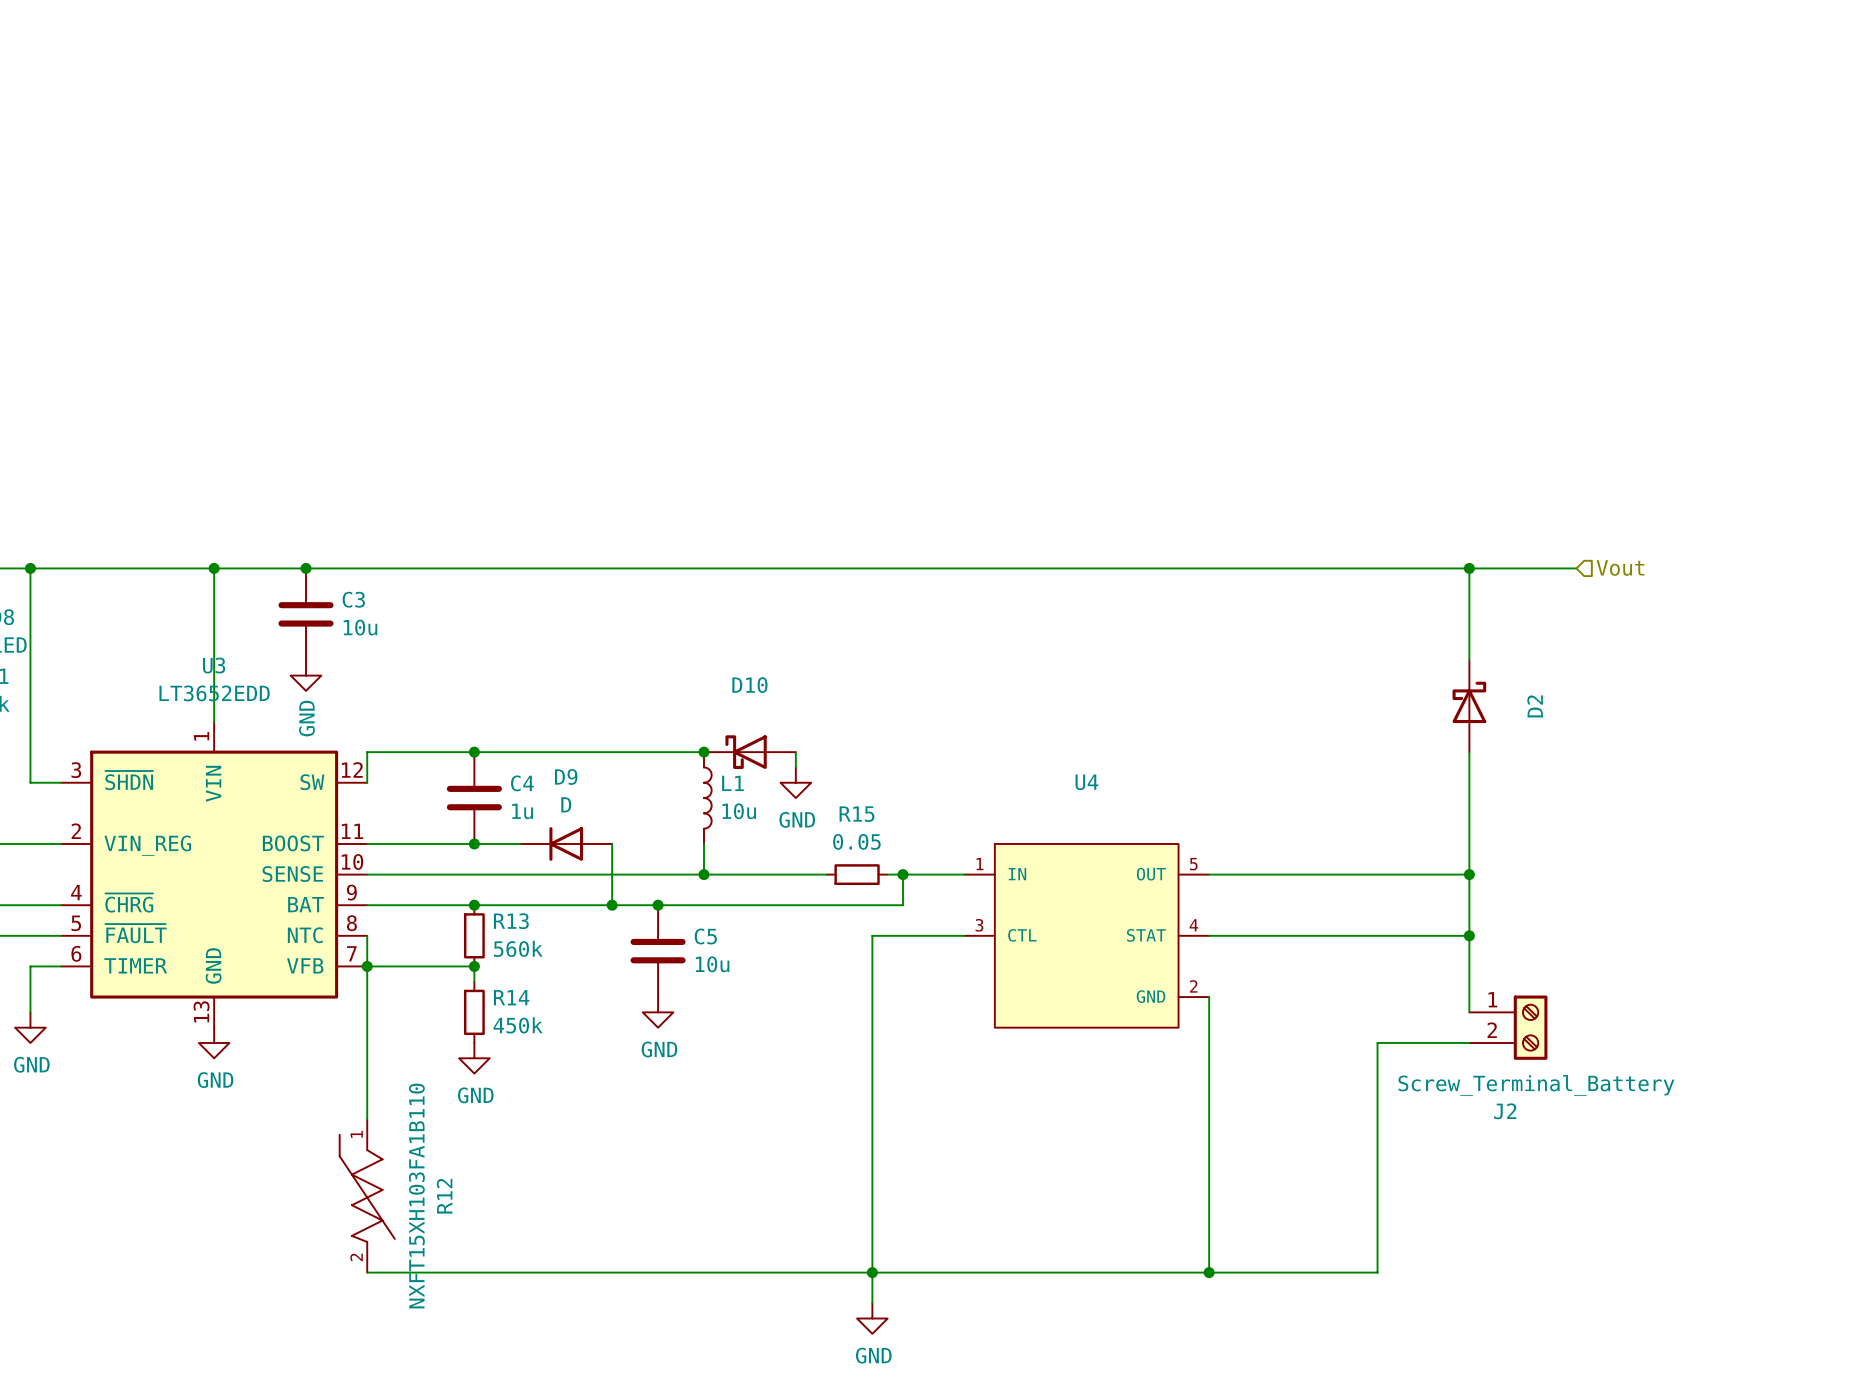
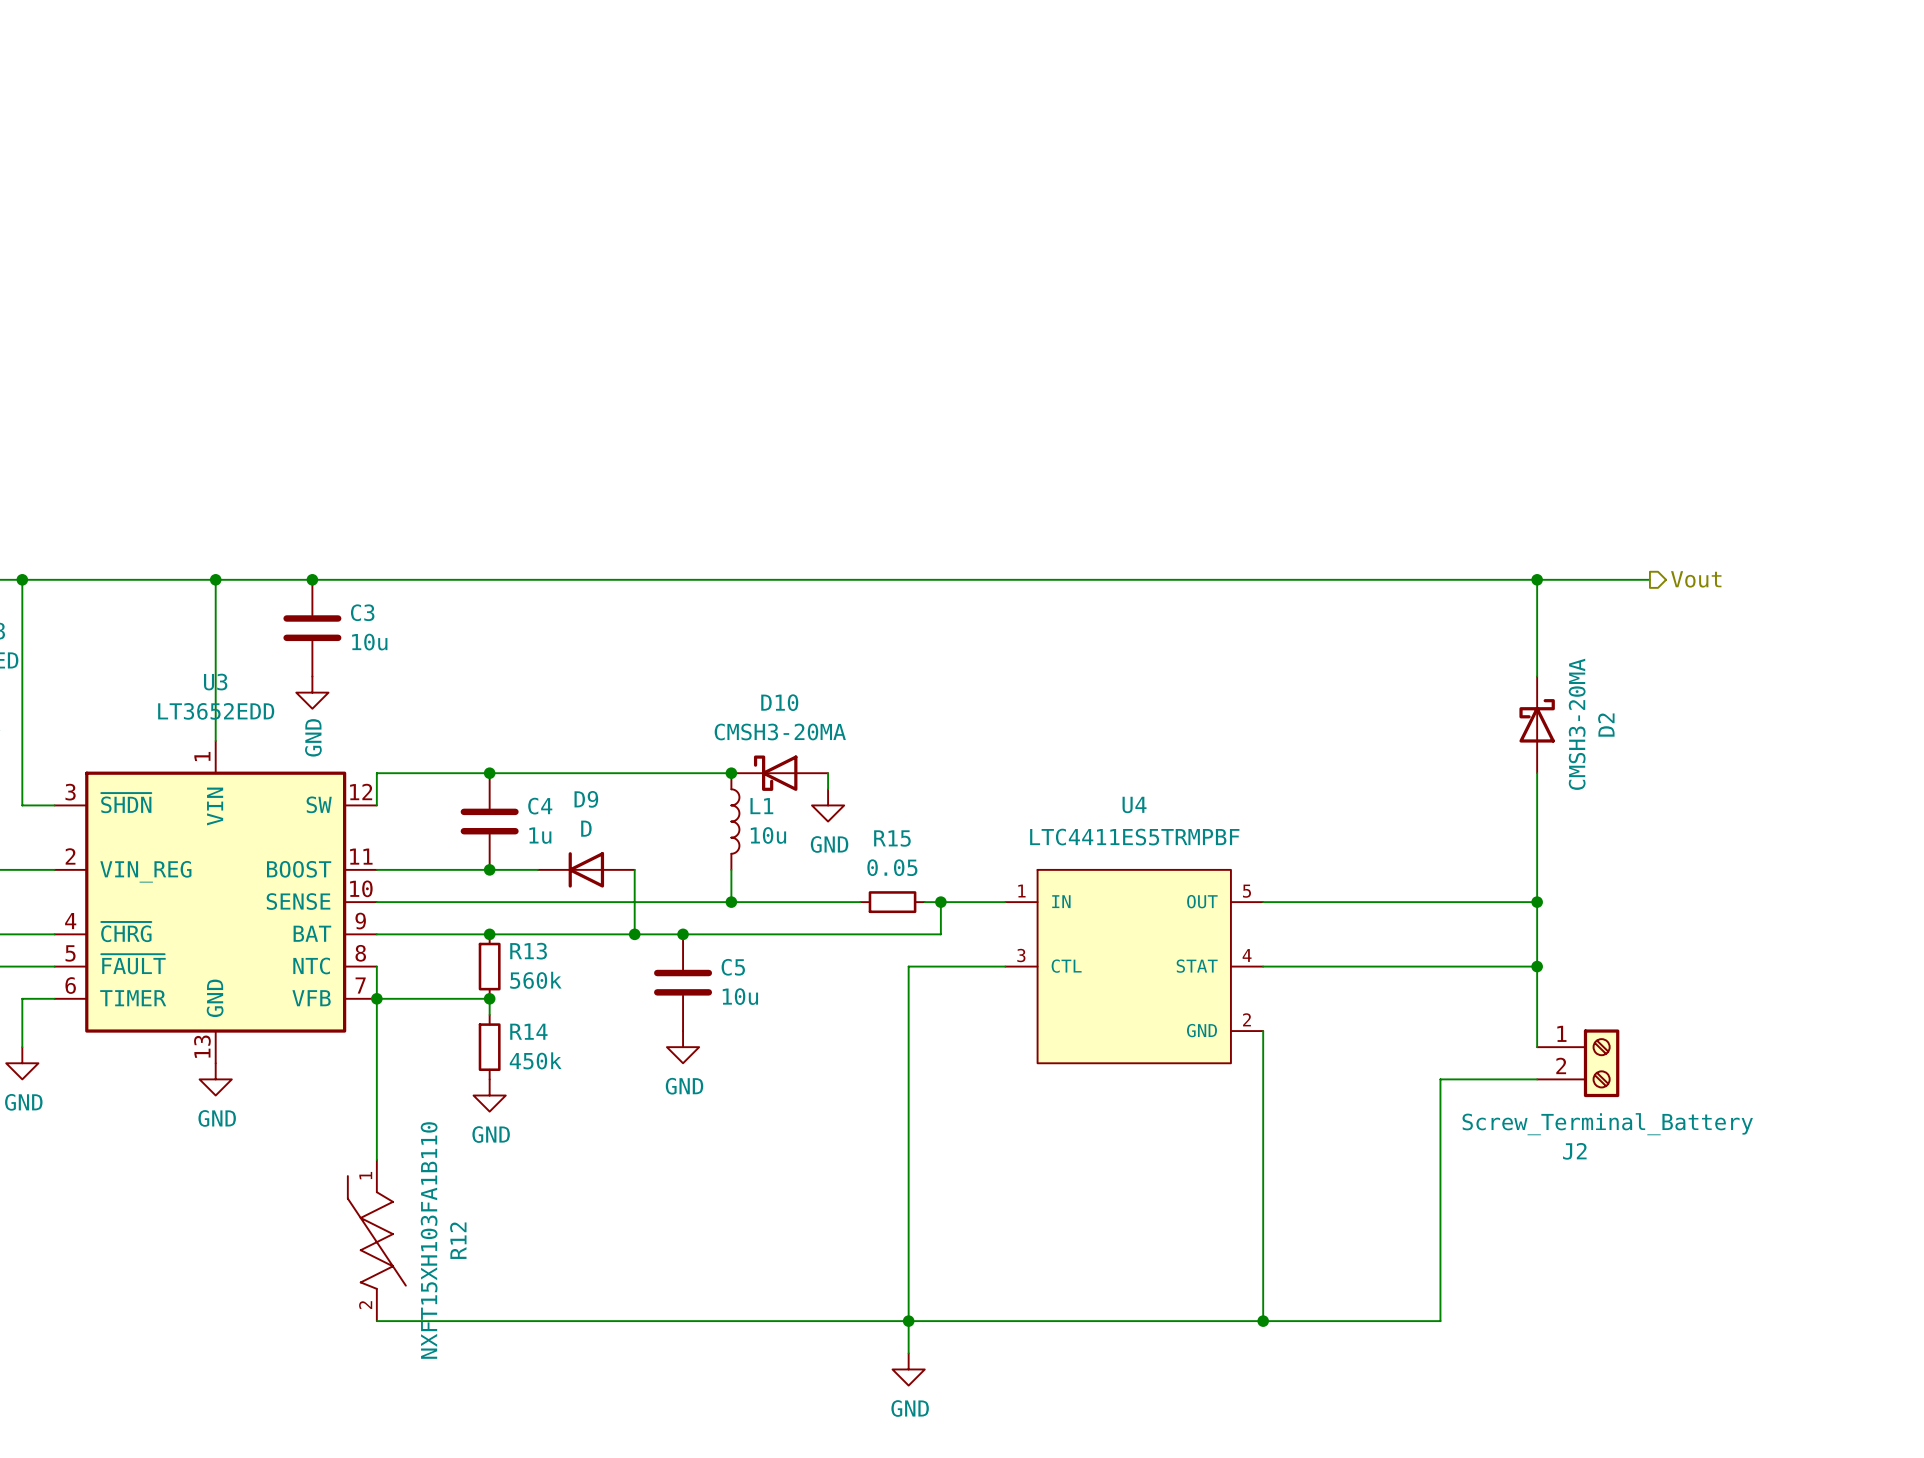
hierarchical label shape: input (1620, 568) -> output (1696, 579)
D2 value: none -> CMSH3-20MA (1577, 724)
D10 value: none -> CMSH3-20MA (780, 732)
U4 value: none -> LTC4411ES5TRMPBF (1134, 837)

